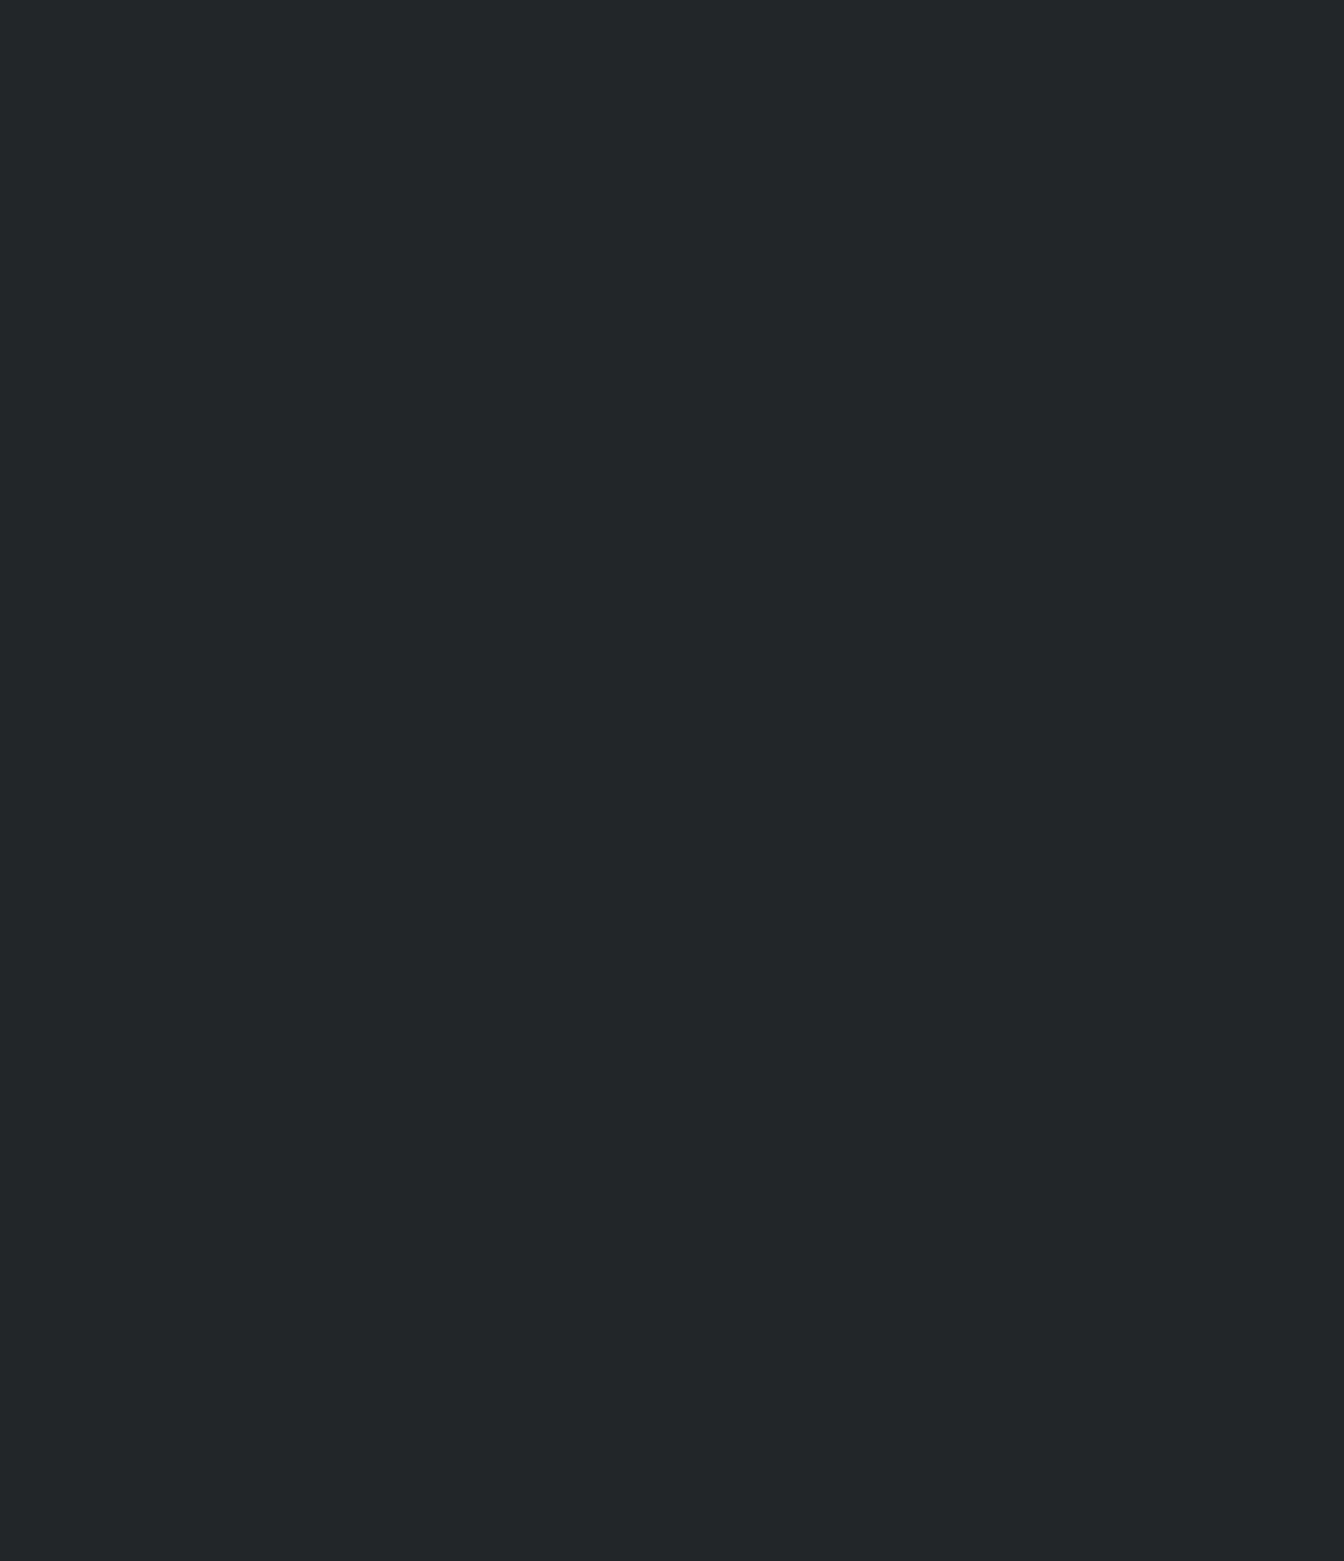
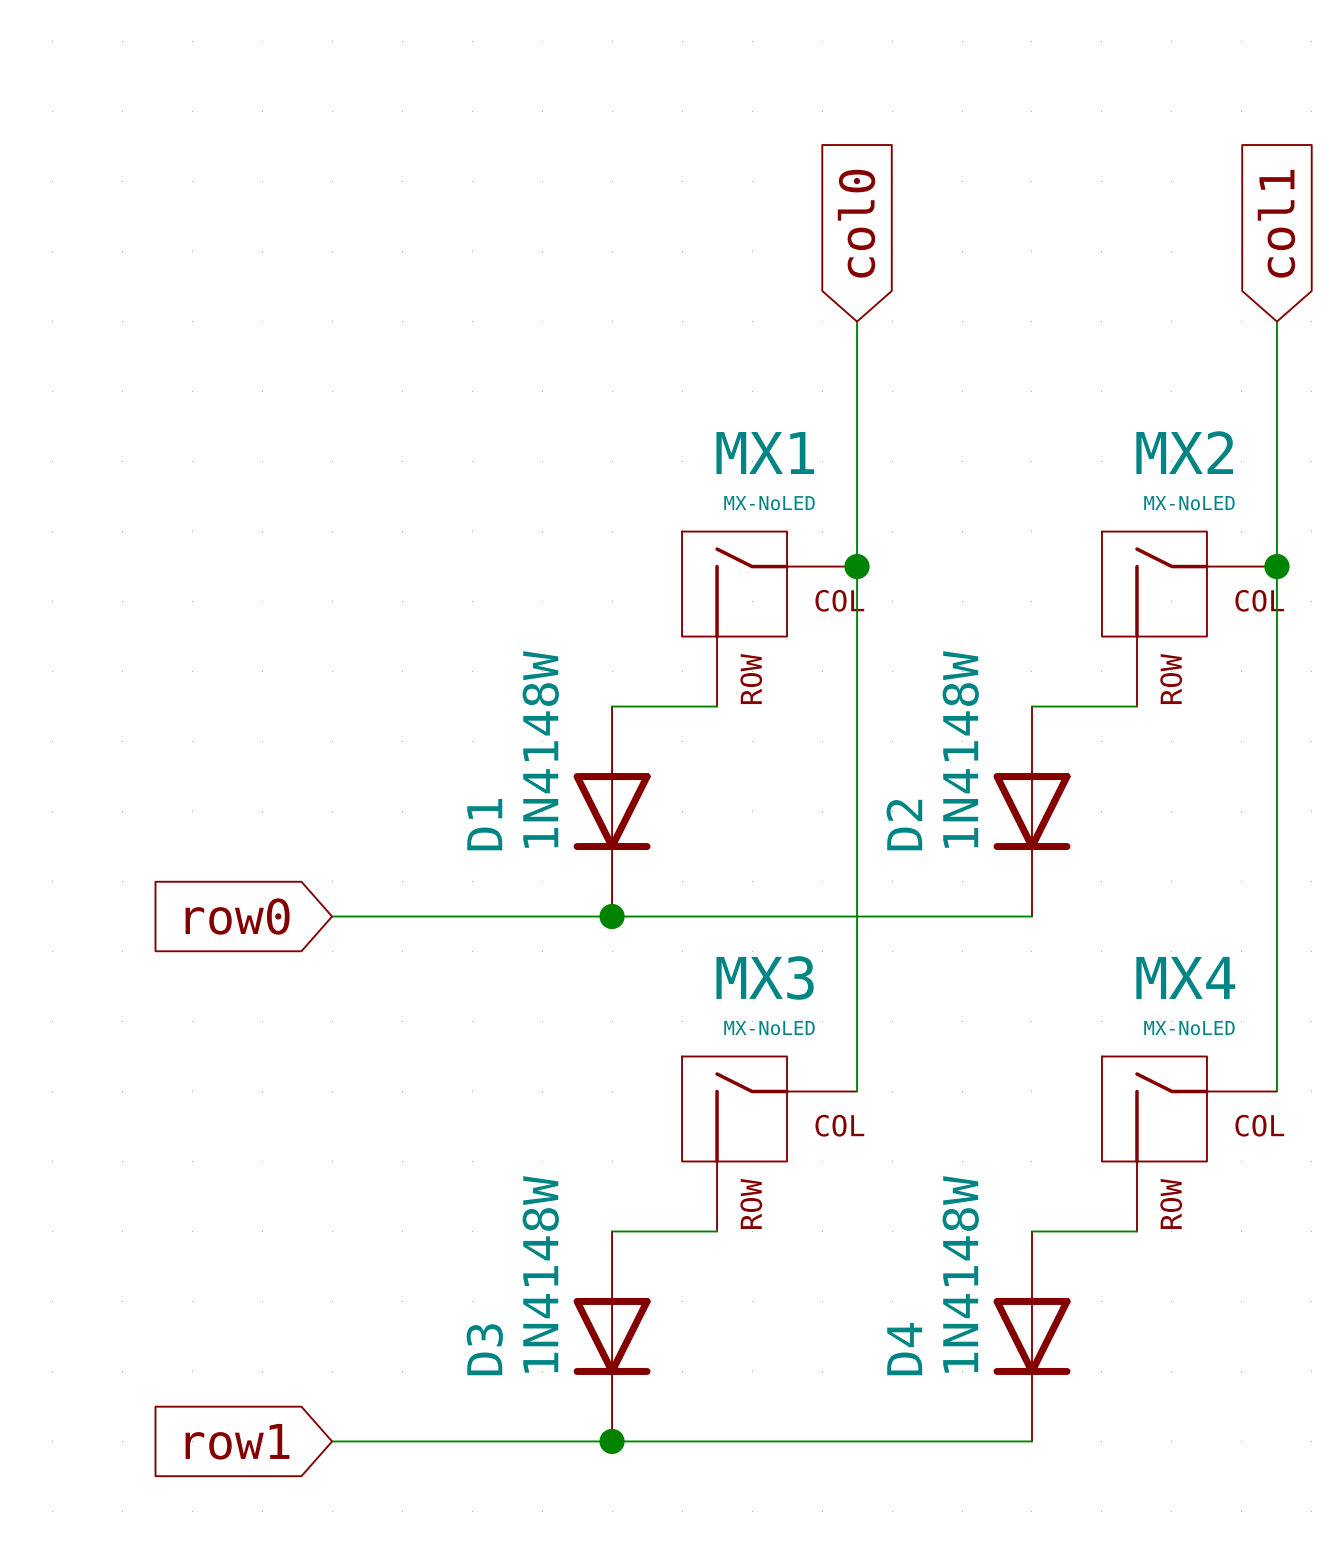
global label: none -> col0 (856, 223)
global label: none -> col1 (1276, 223)
wire: none -> (857, 321) (857, 1091)
wire: none -> (1276, 321) (1276, 1091)
junction: none -> (857, 566)
junction: none -> (1276, 566)
MX1: none -> MX-NoLED (769, 619)
MX2: none -> MX-NoLED (1189, 619)
wire: none -> (612, 706) (717, 706)
wire: none -> (1031, 706) (1136, 706)
D1: none -> 1N4148W (612, 811)
D2: none -> 1N4148W (1031, 811)
global label: none -> row0 (237, 916)
wire: none -> (332, 916) (1031, 916)
junction: none -> (612, 916)
MX3: none -> MX-NoLED (769, 1143)
MX4: none -> MX-NoLED (1189, 1143)
wire: none -> (612, 1231) (717, 1231)
wire: none -> (1031, 1231) (1136, 1231)
D3: none -> 1N4148W (612, 1336)
D4: none -> 1N4148W (1031, 1336)
global label: none -> row1 (237, 1441)
wire: none -> (332, 1441) (1031, 1441)
junction: none -> (612, 1441)

